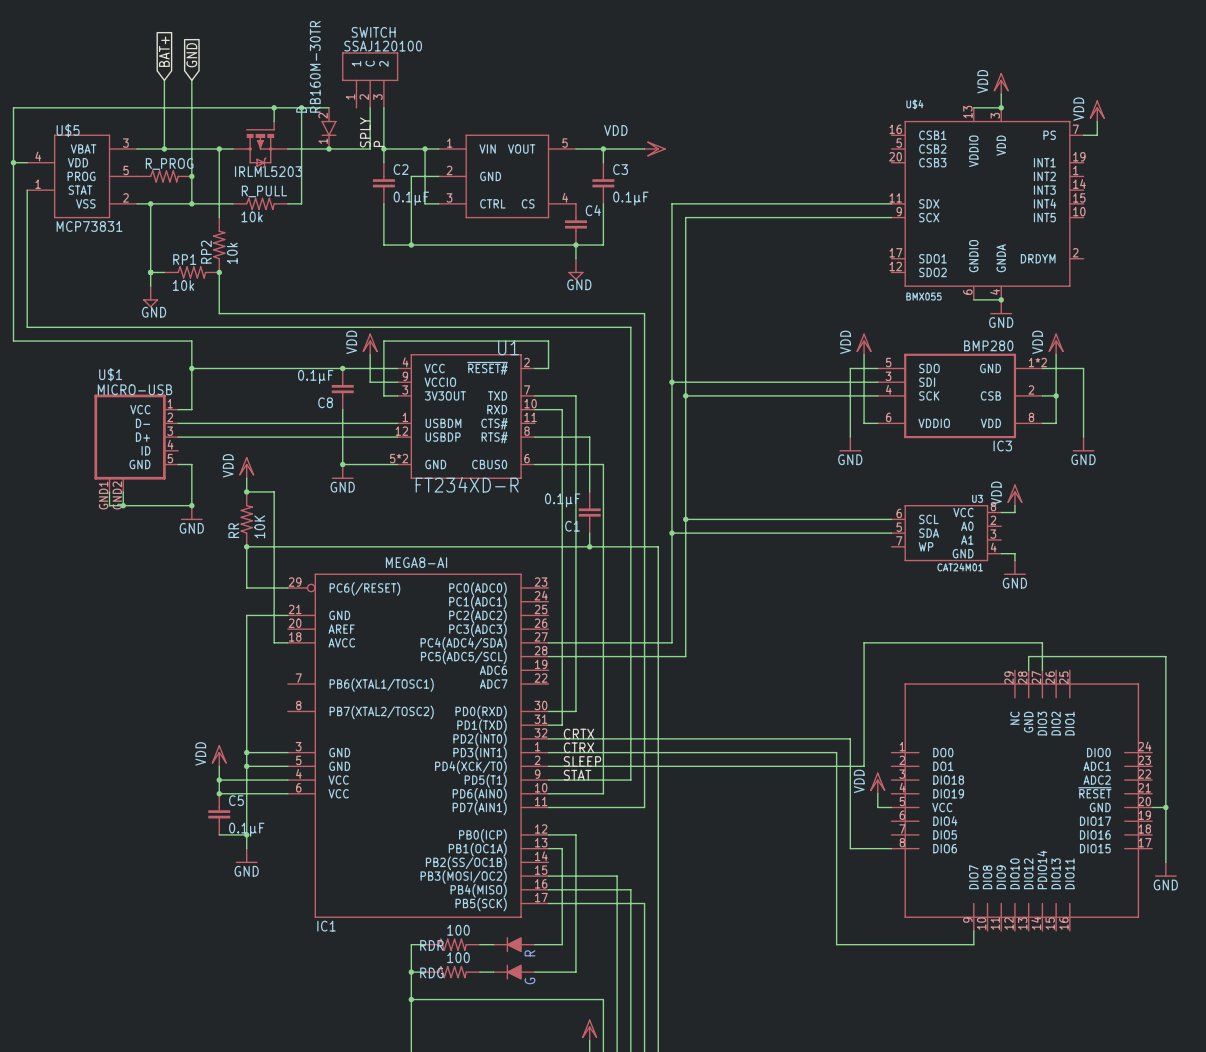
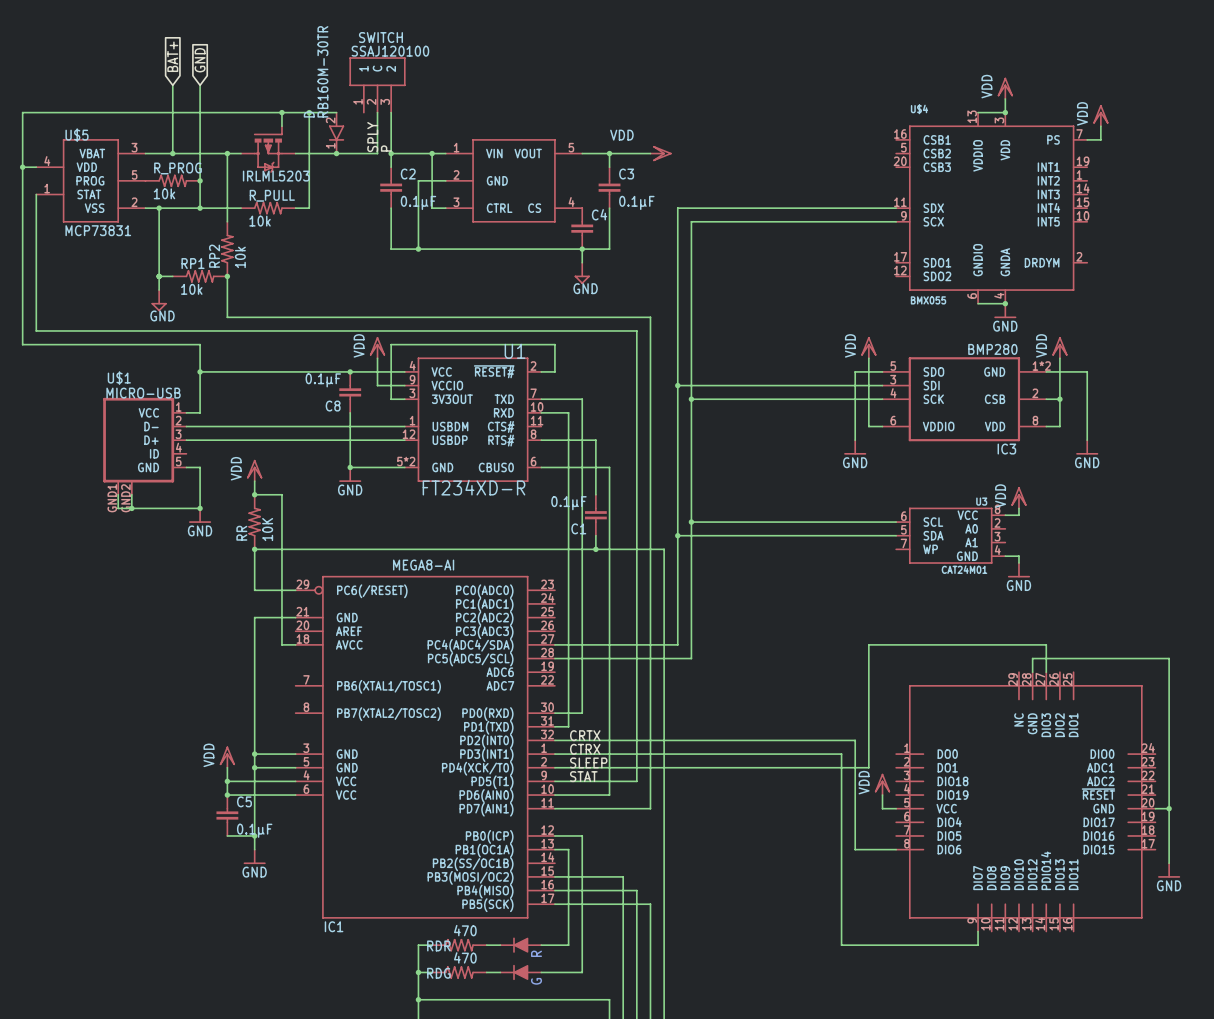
R_PROG value: none -> 10k (164, 193)
RDR value: 100 (458, 930) -> 470 (465, 930)
RDG value: 100 (458, 957) -> 470 (465, 957)

